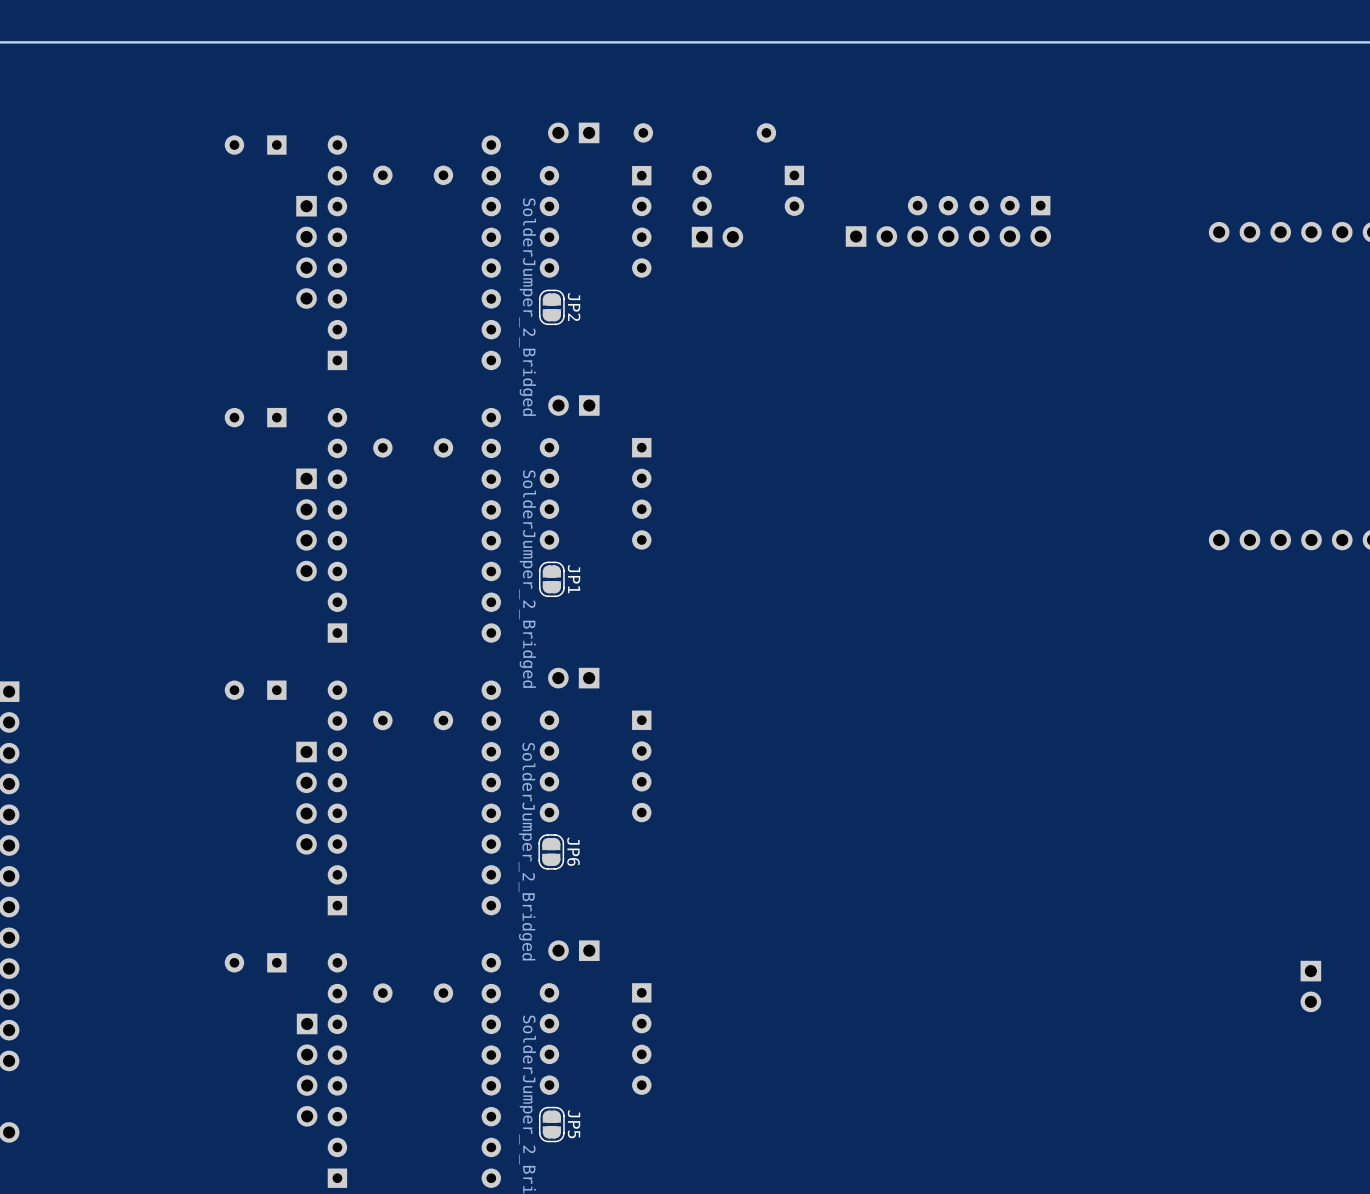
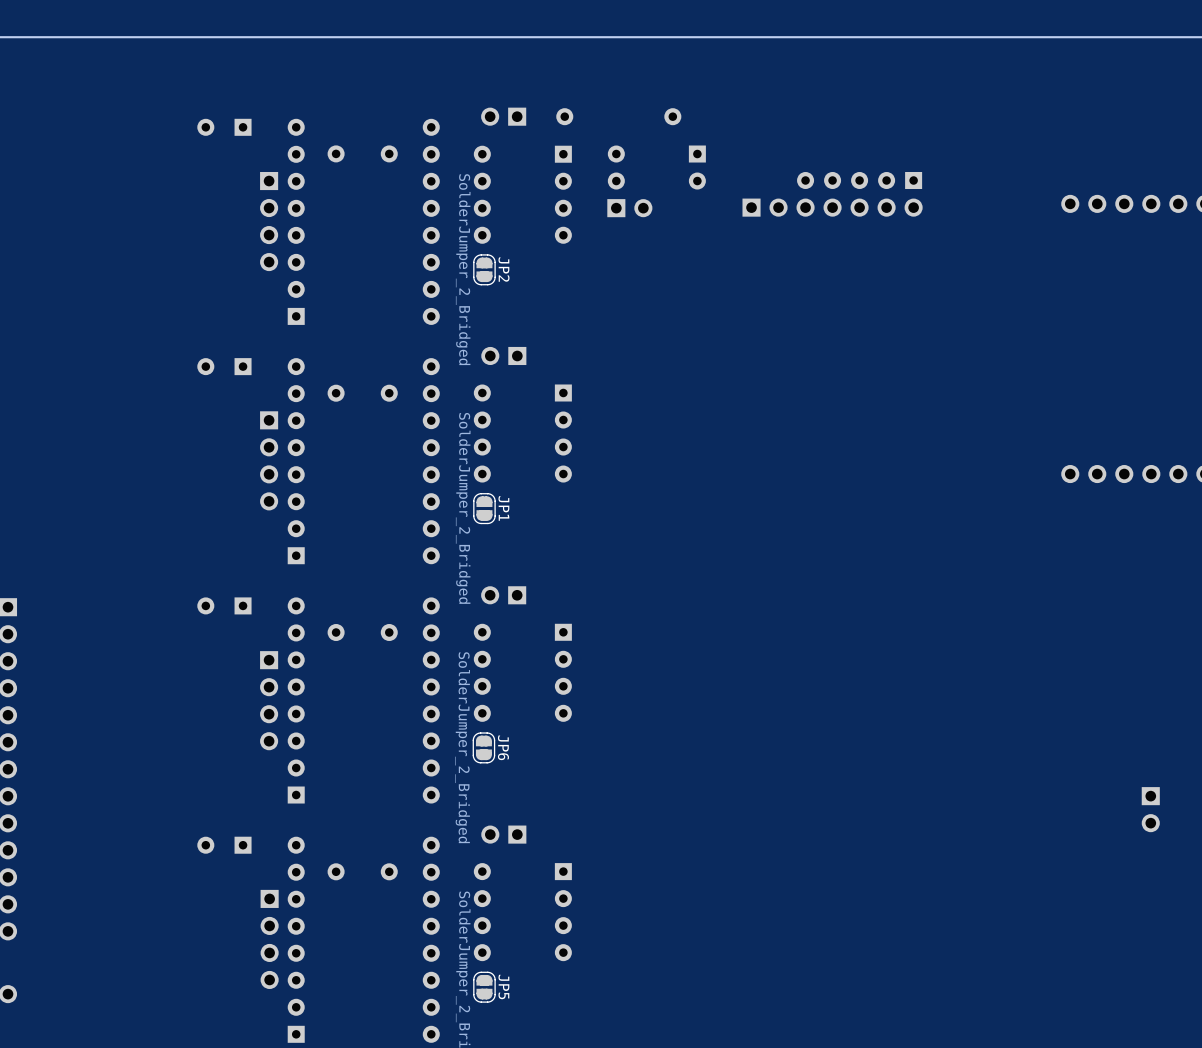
part position: (1310, 986) -> (1150, 809)

